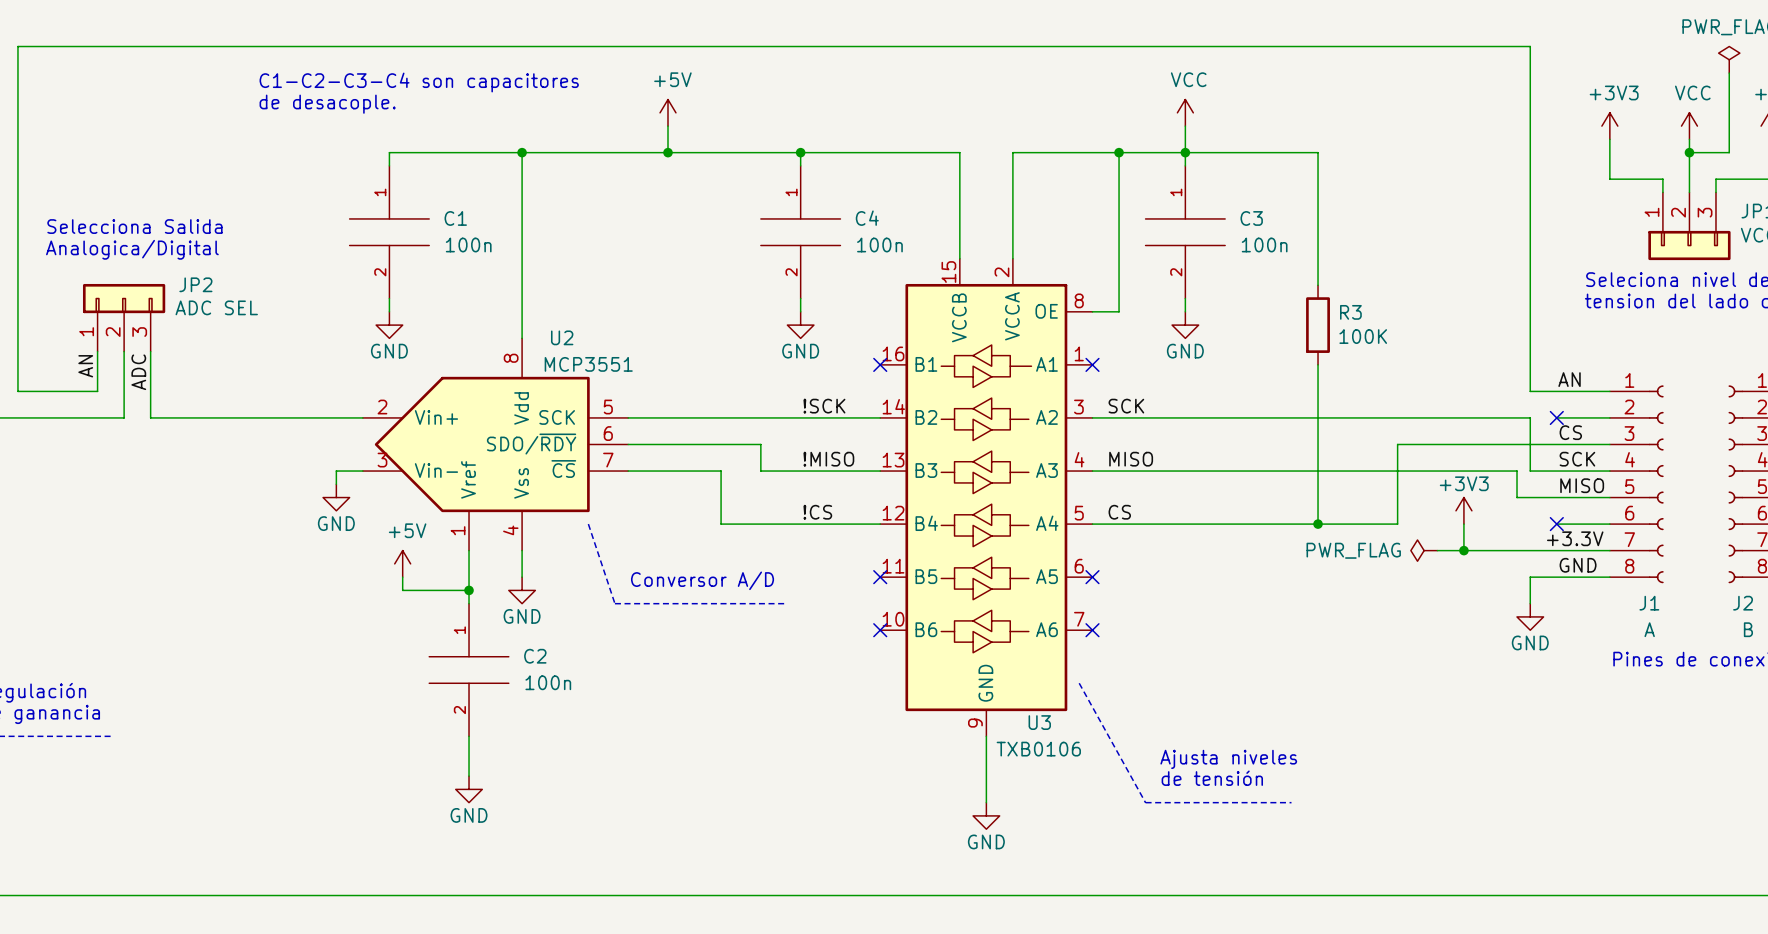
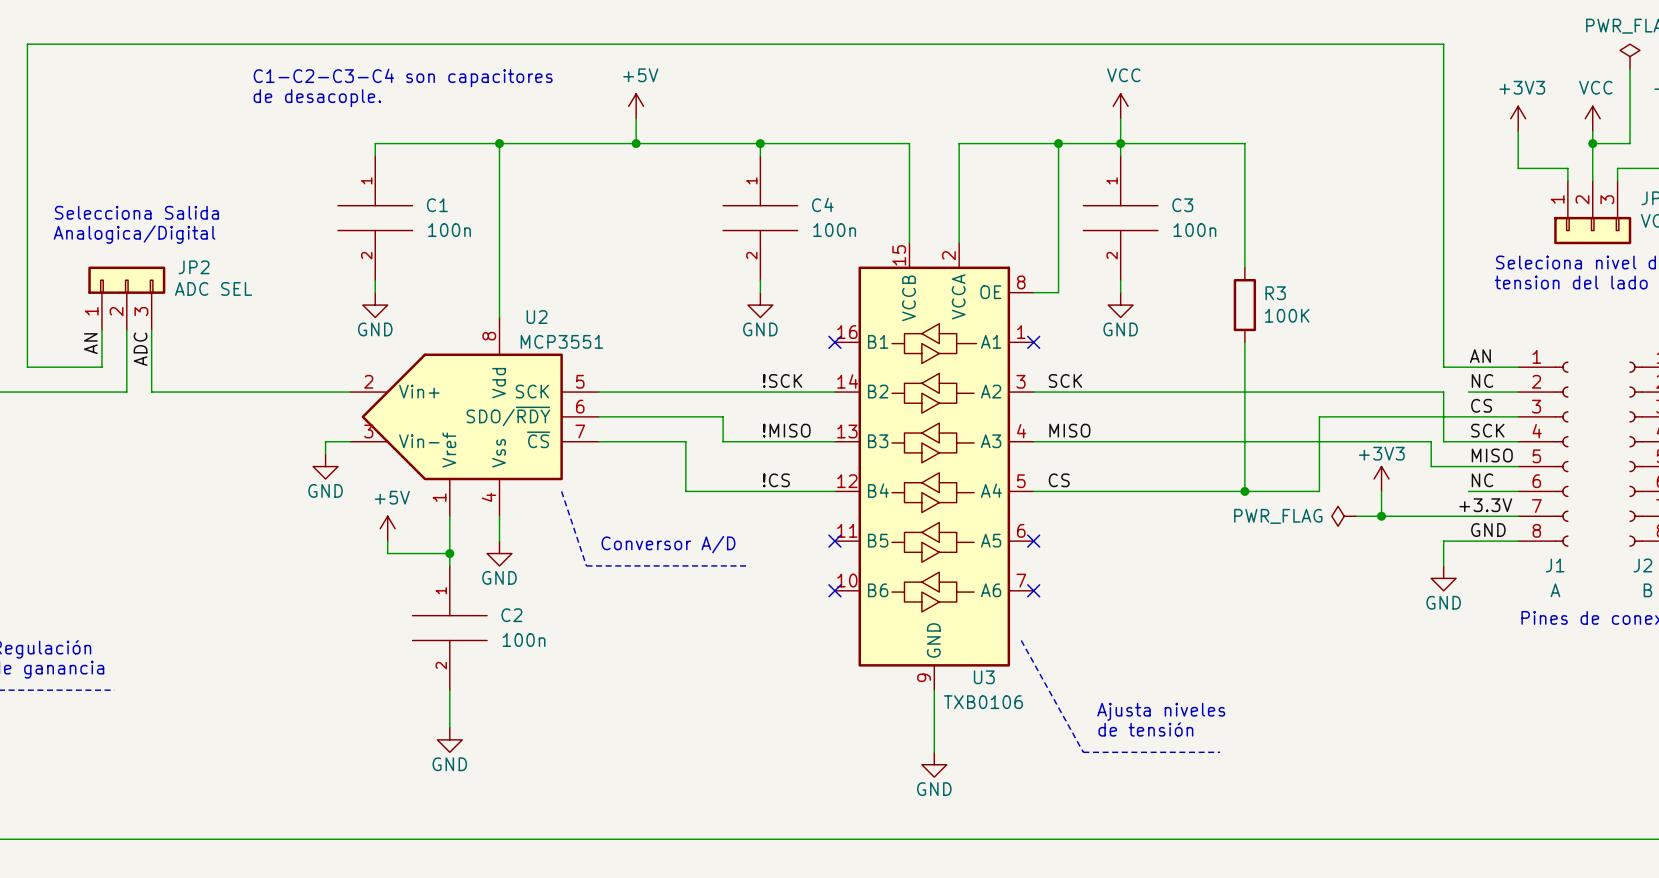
label: none -> NC (1482, 380)
no-connect mark: (1556, 417) -> none
label: none -> NC (1482, 480)
no-connect mark: (1556, 524) -> none

